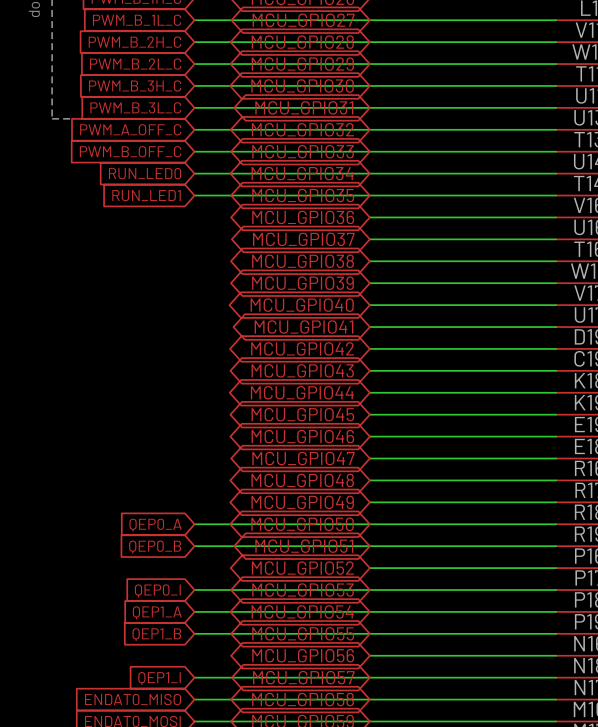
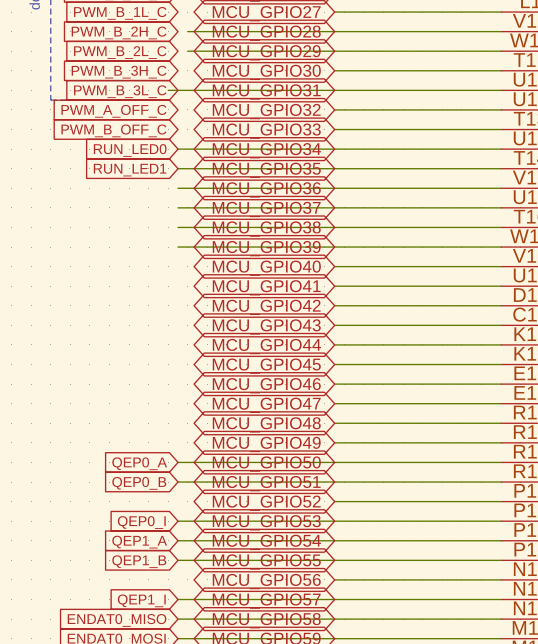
wire: (194, 20) (369, 20) -> none
wire: (194, 42) (205, 42) -> none
wire: (194, 64) (205, 64) -> (168, 90) (178, 90)
wire: (194, 85) (369, 85) -> (178, 188) (334, 188)
wire: (194, 129) (369, 129) -> (178, 227) (334, 227)
wire: (194, 151) (369, 151) -> (178, 247) (334, 247)
wire: none -> (178, 207) (334, 207)

